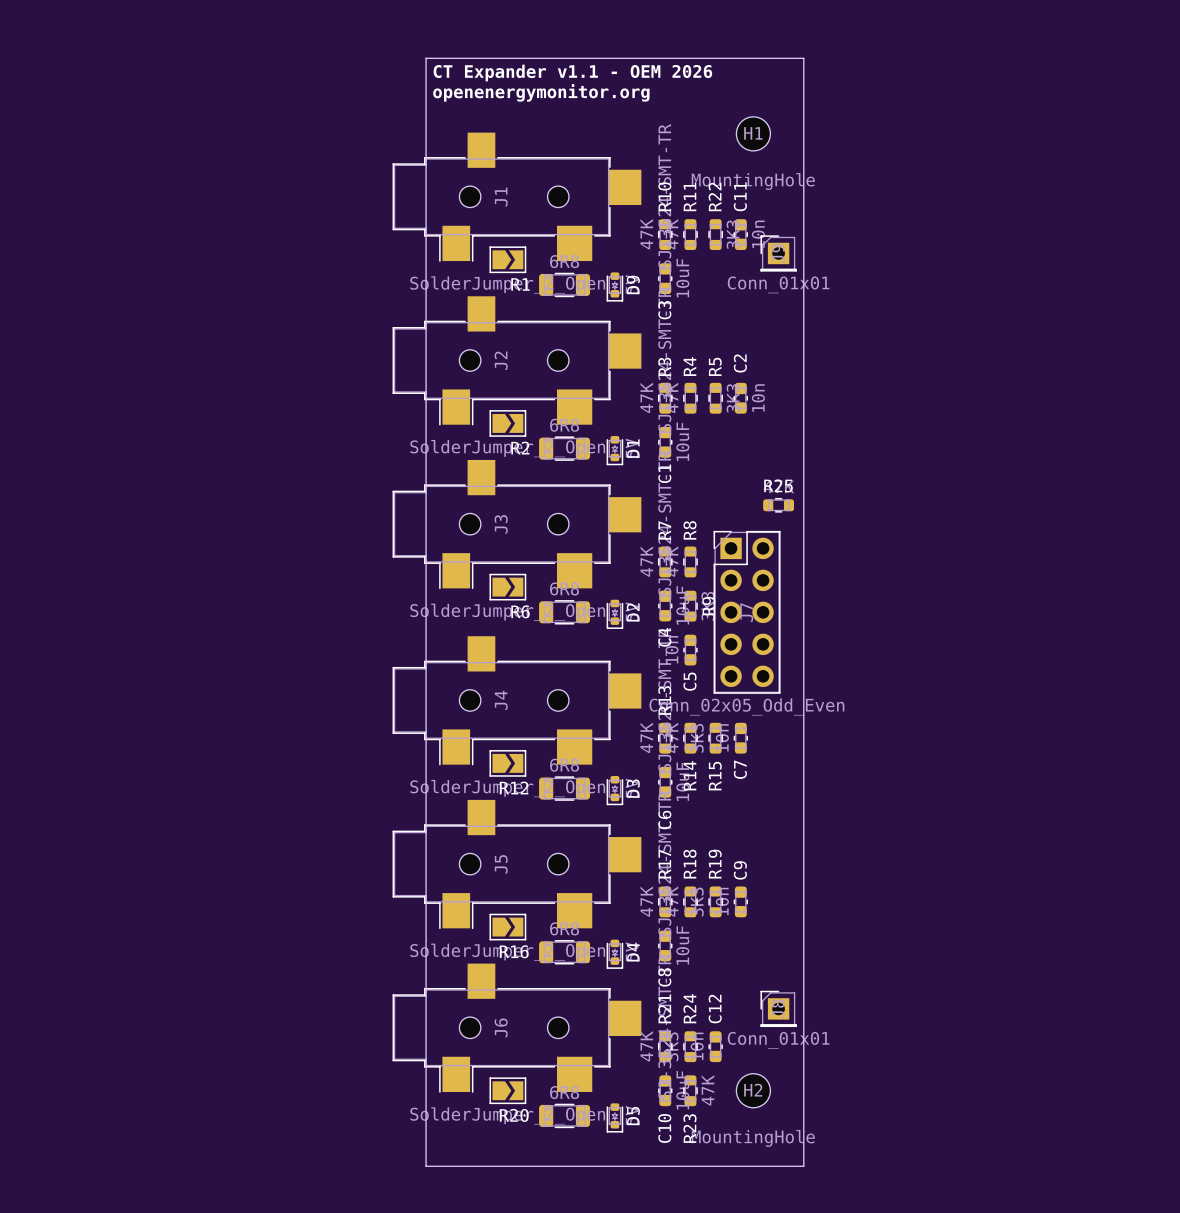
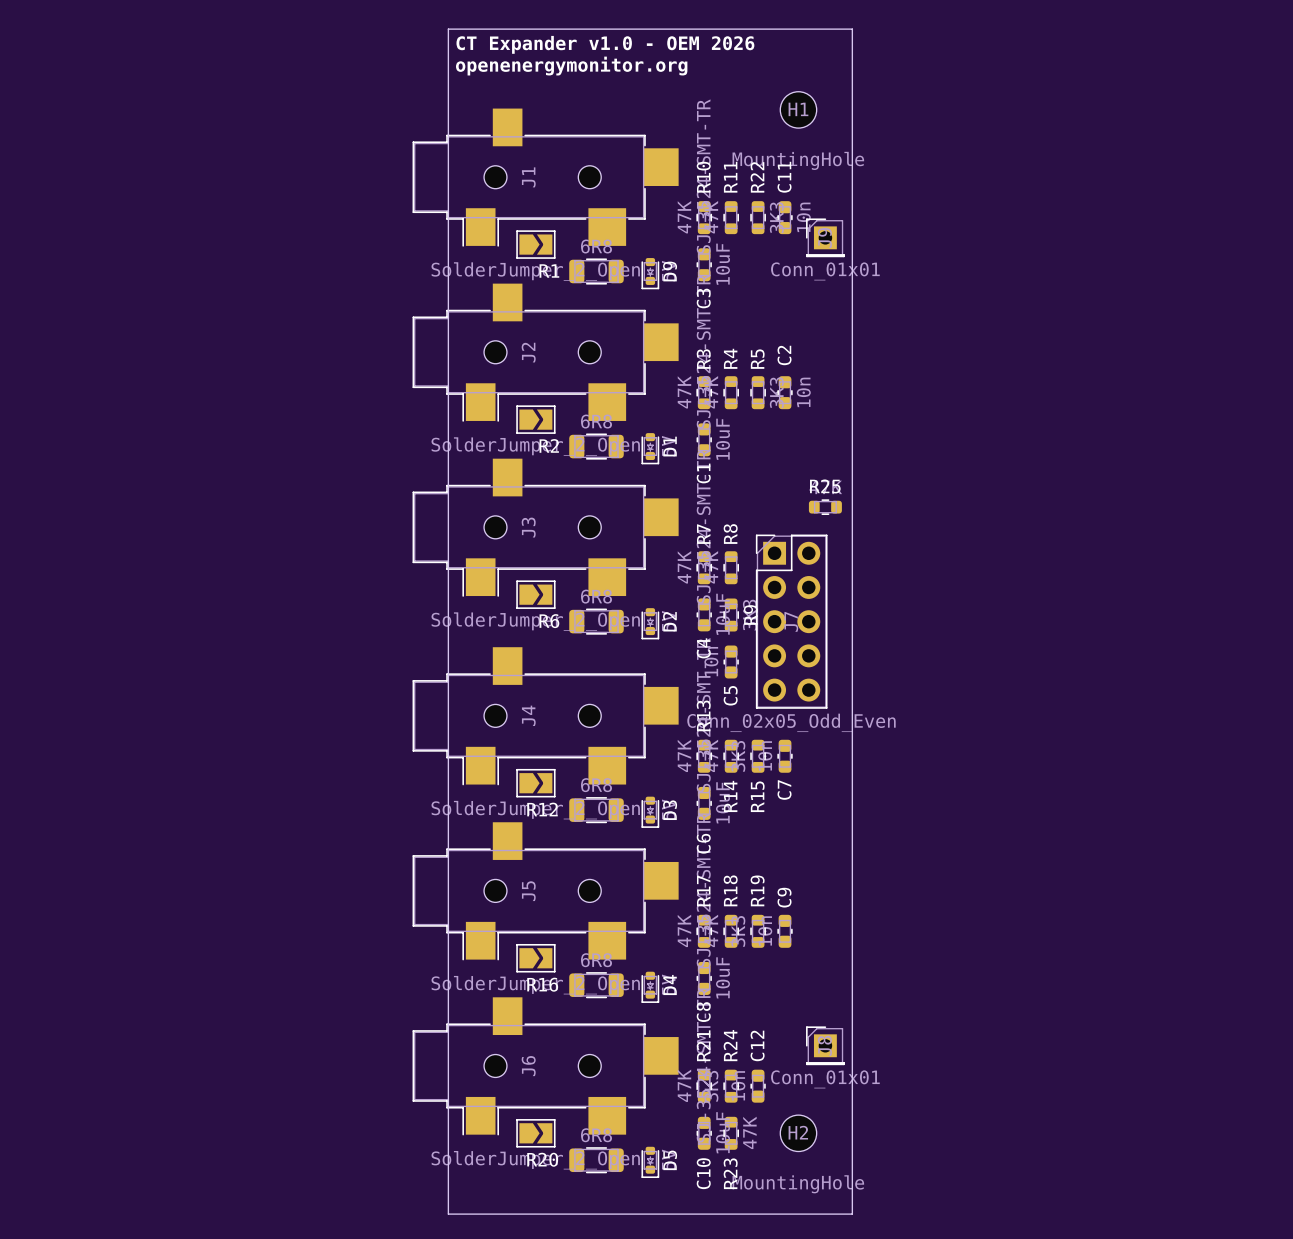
text: CT Expander v1.1 - OEM 2026 (572, 73) -> CT Expander v1.0 - OEM 2026 (605, 44)

